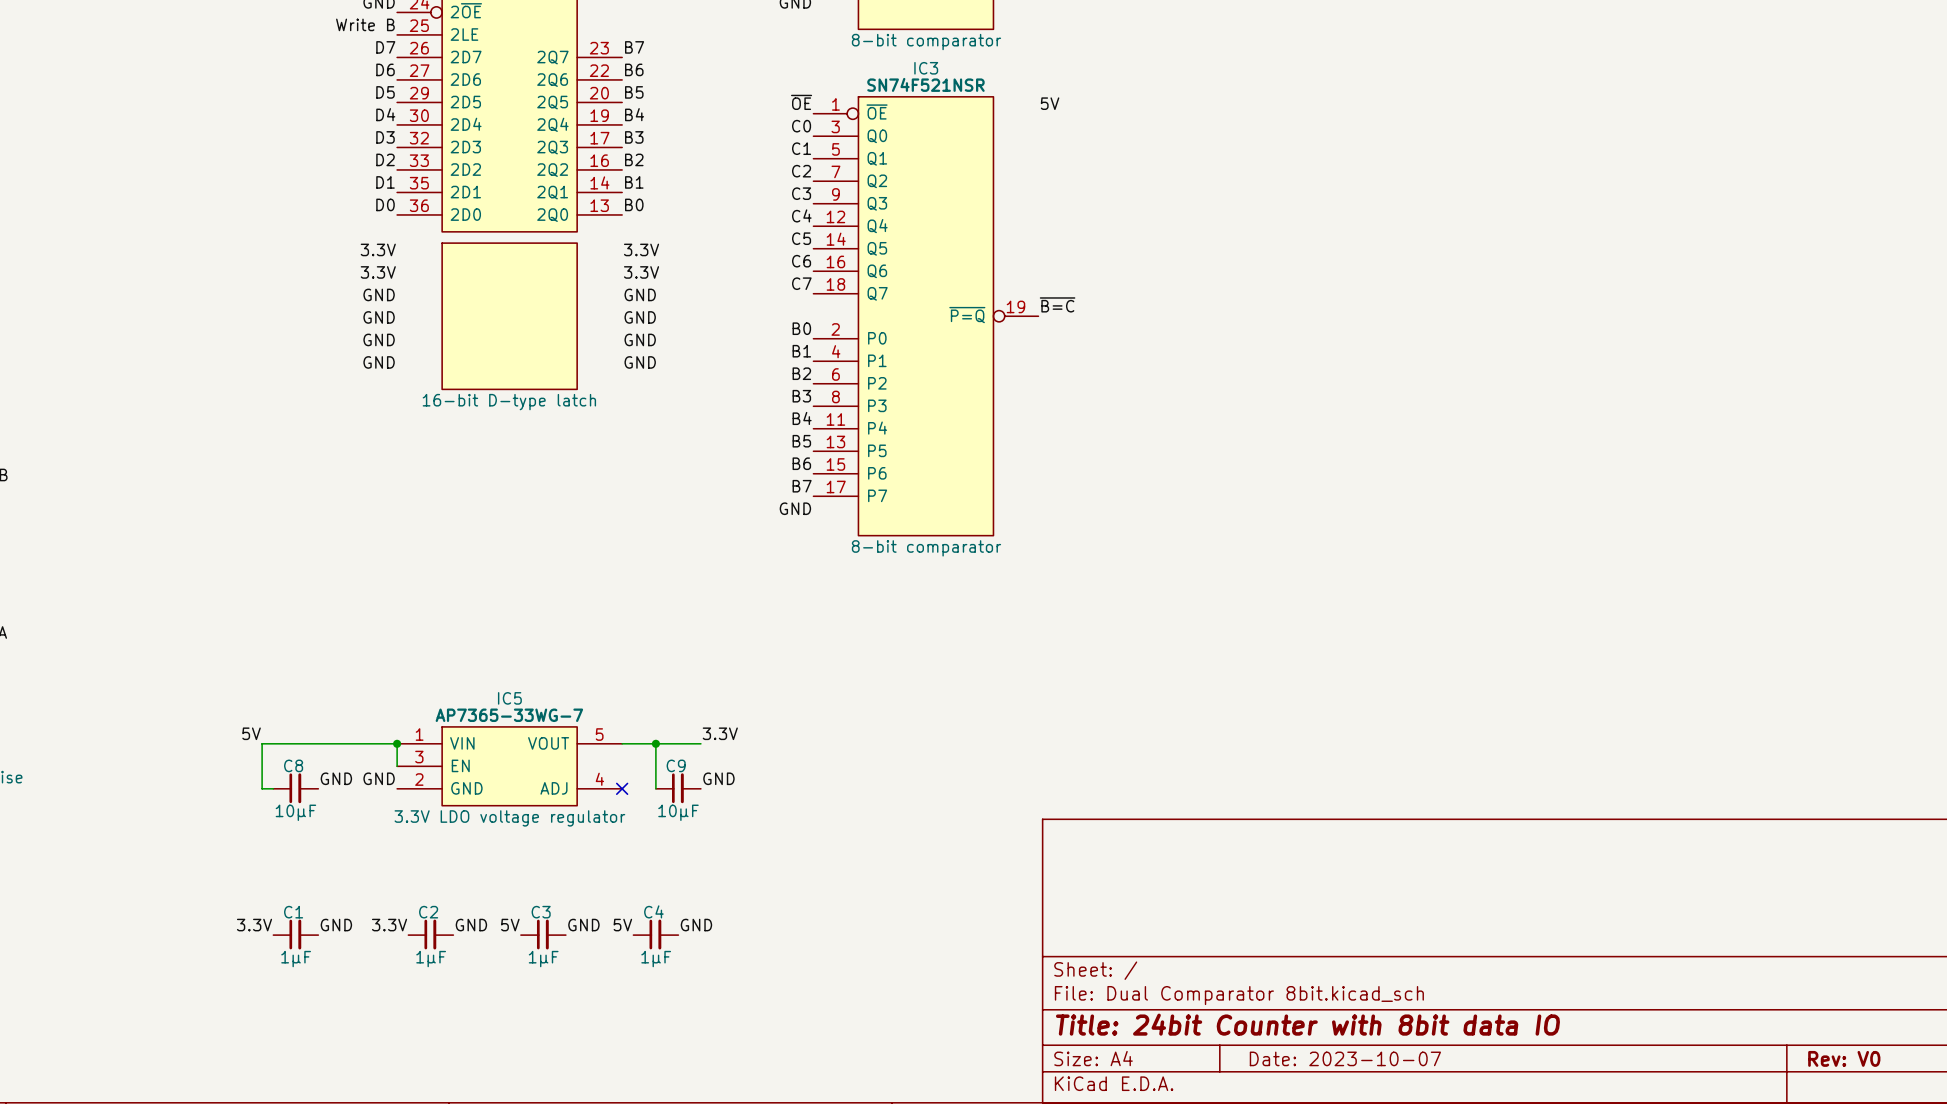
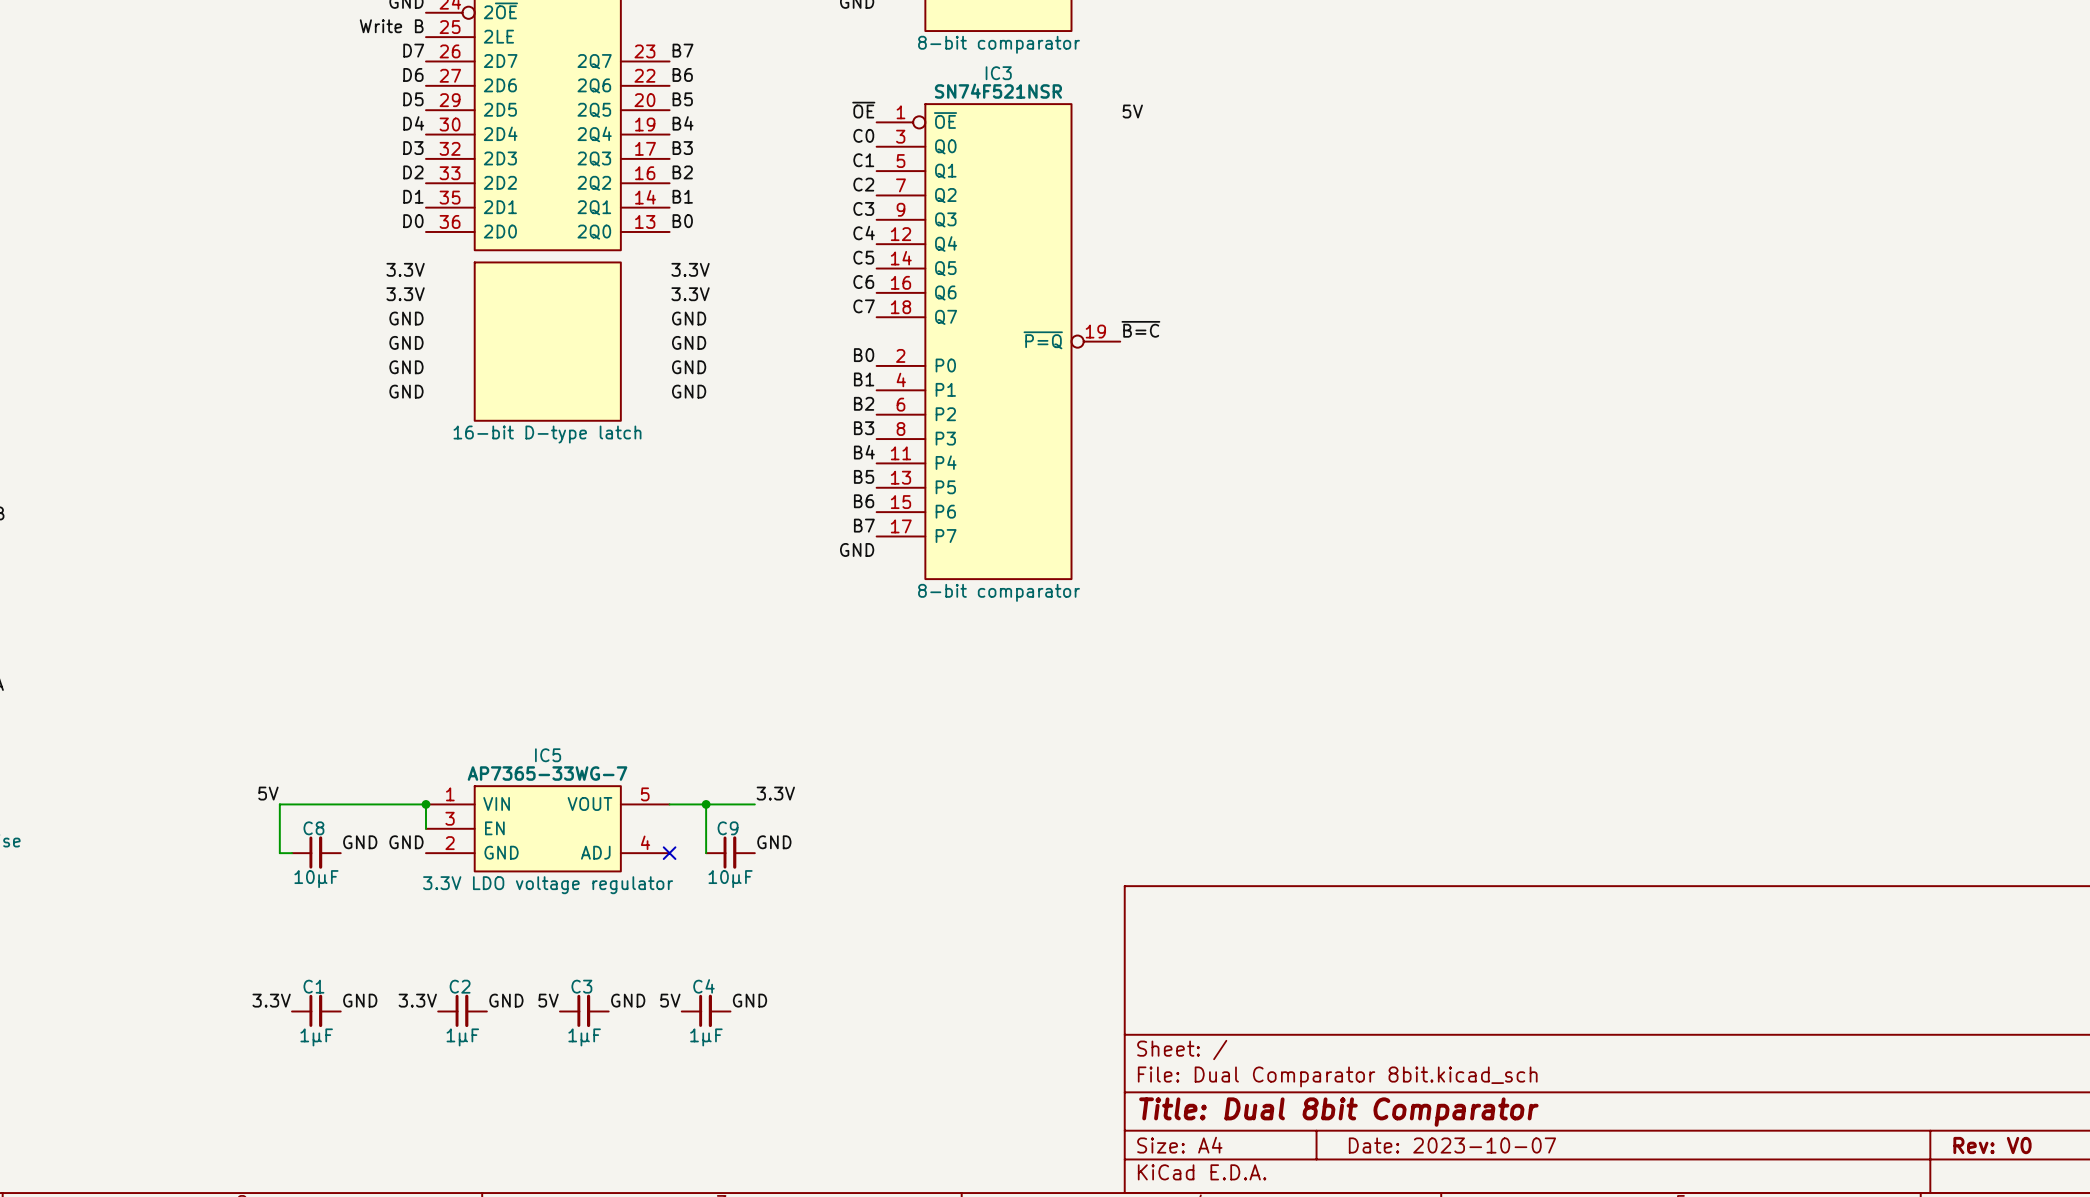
title block: Title: 24bit Counter with 8bit data IO (1307, 1024) -> Title: Dual 8bit Comparator (1338, 1112)

